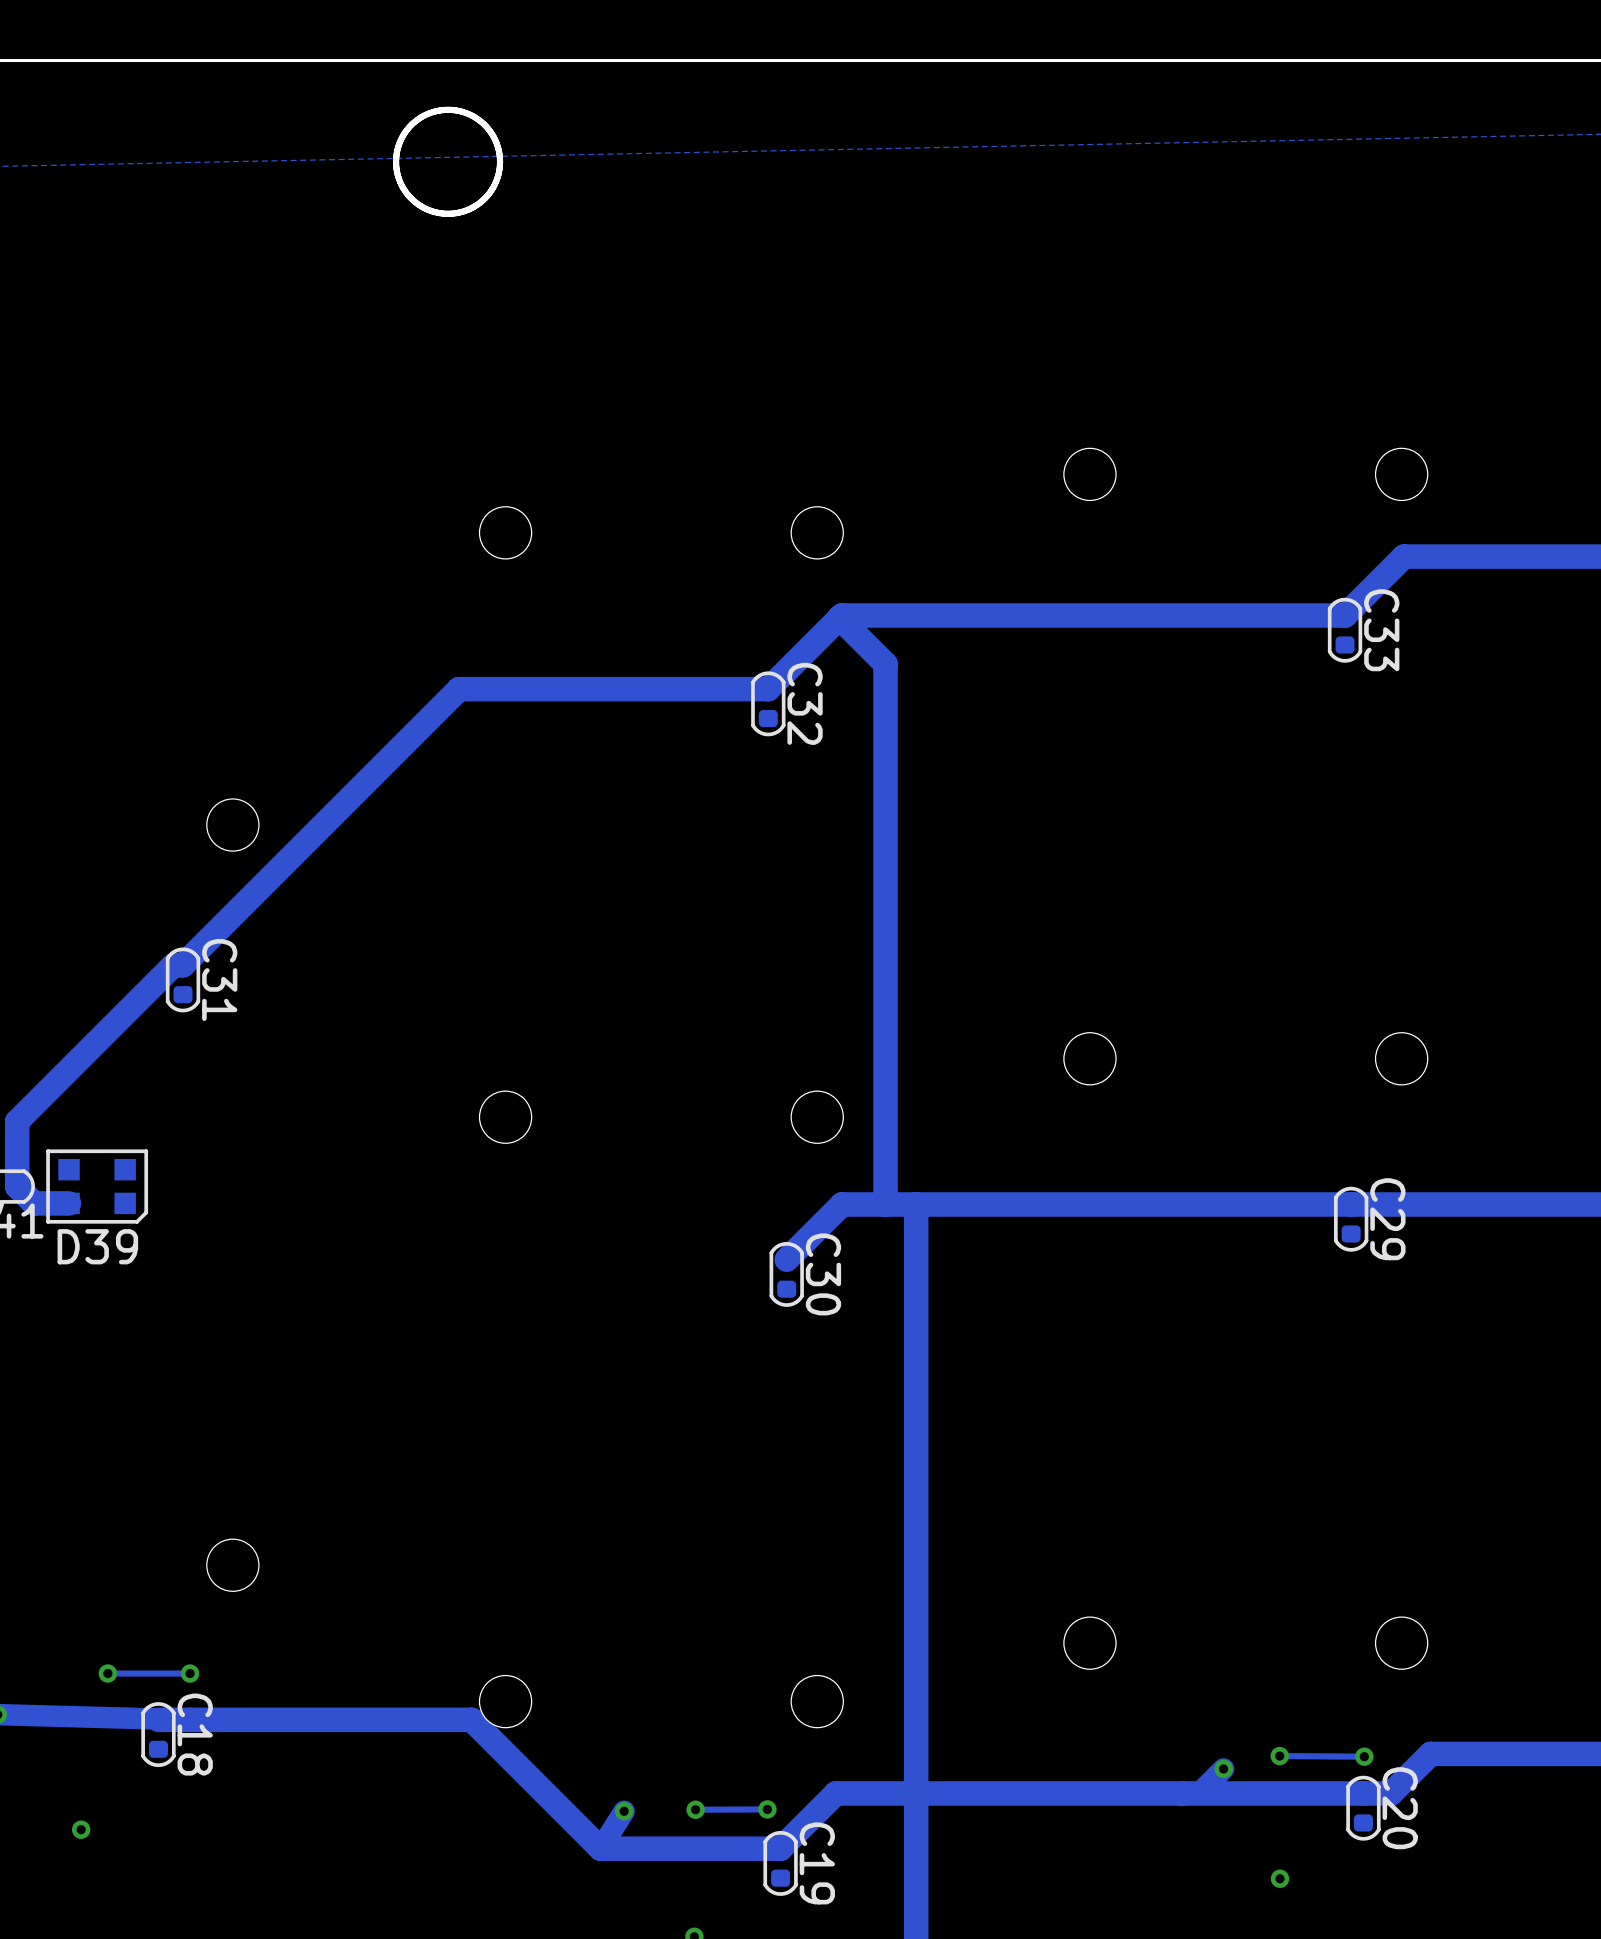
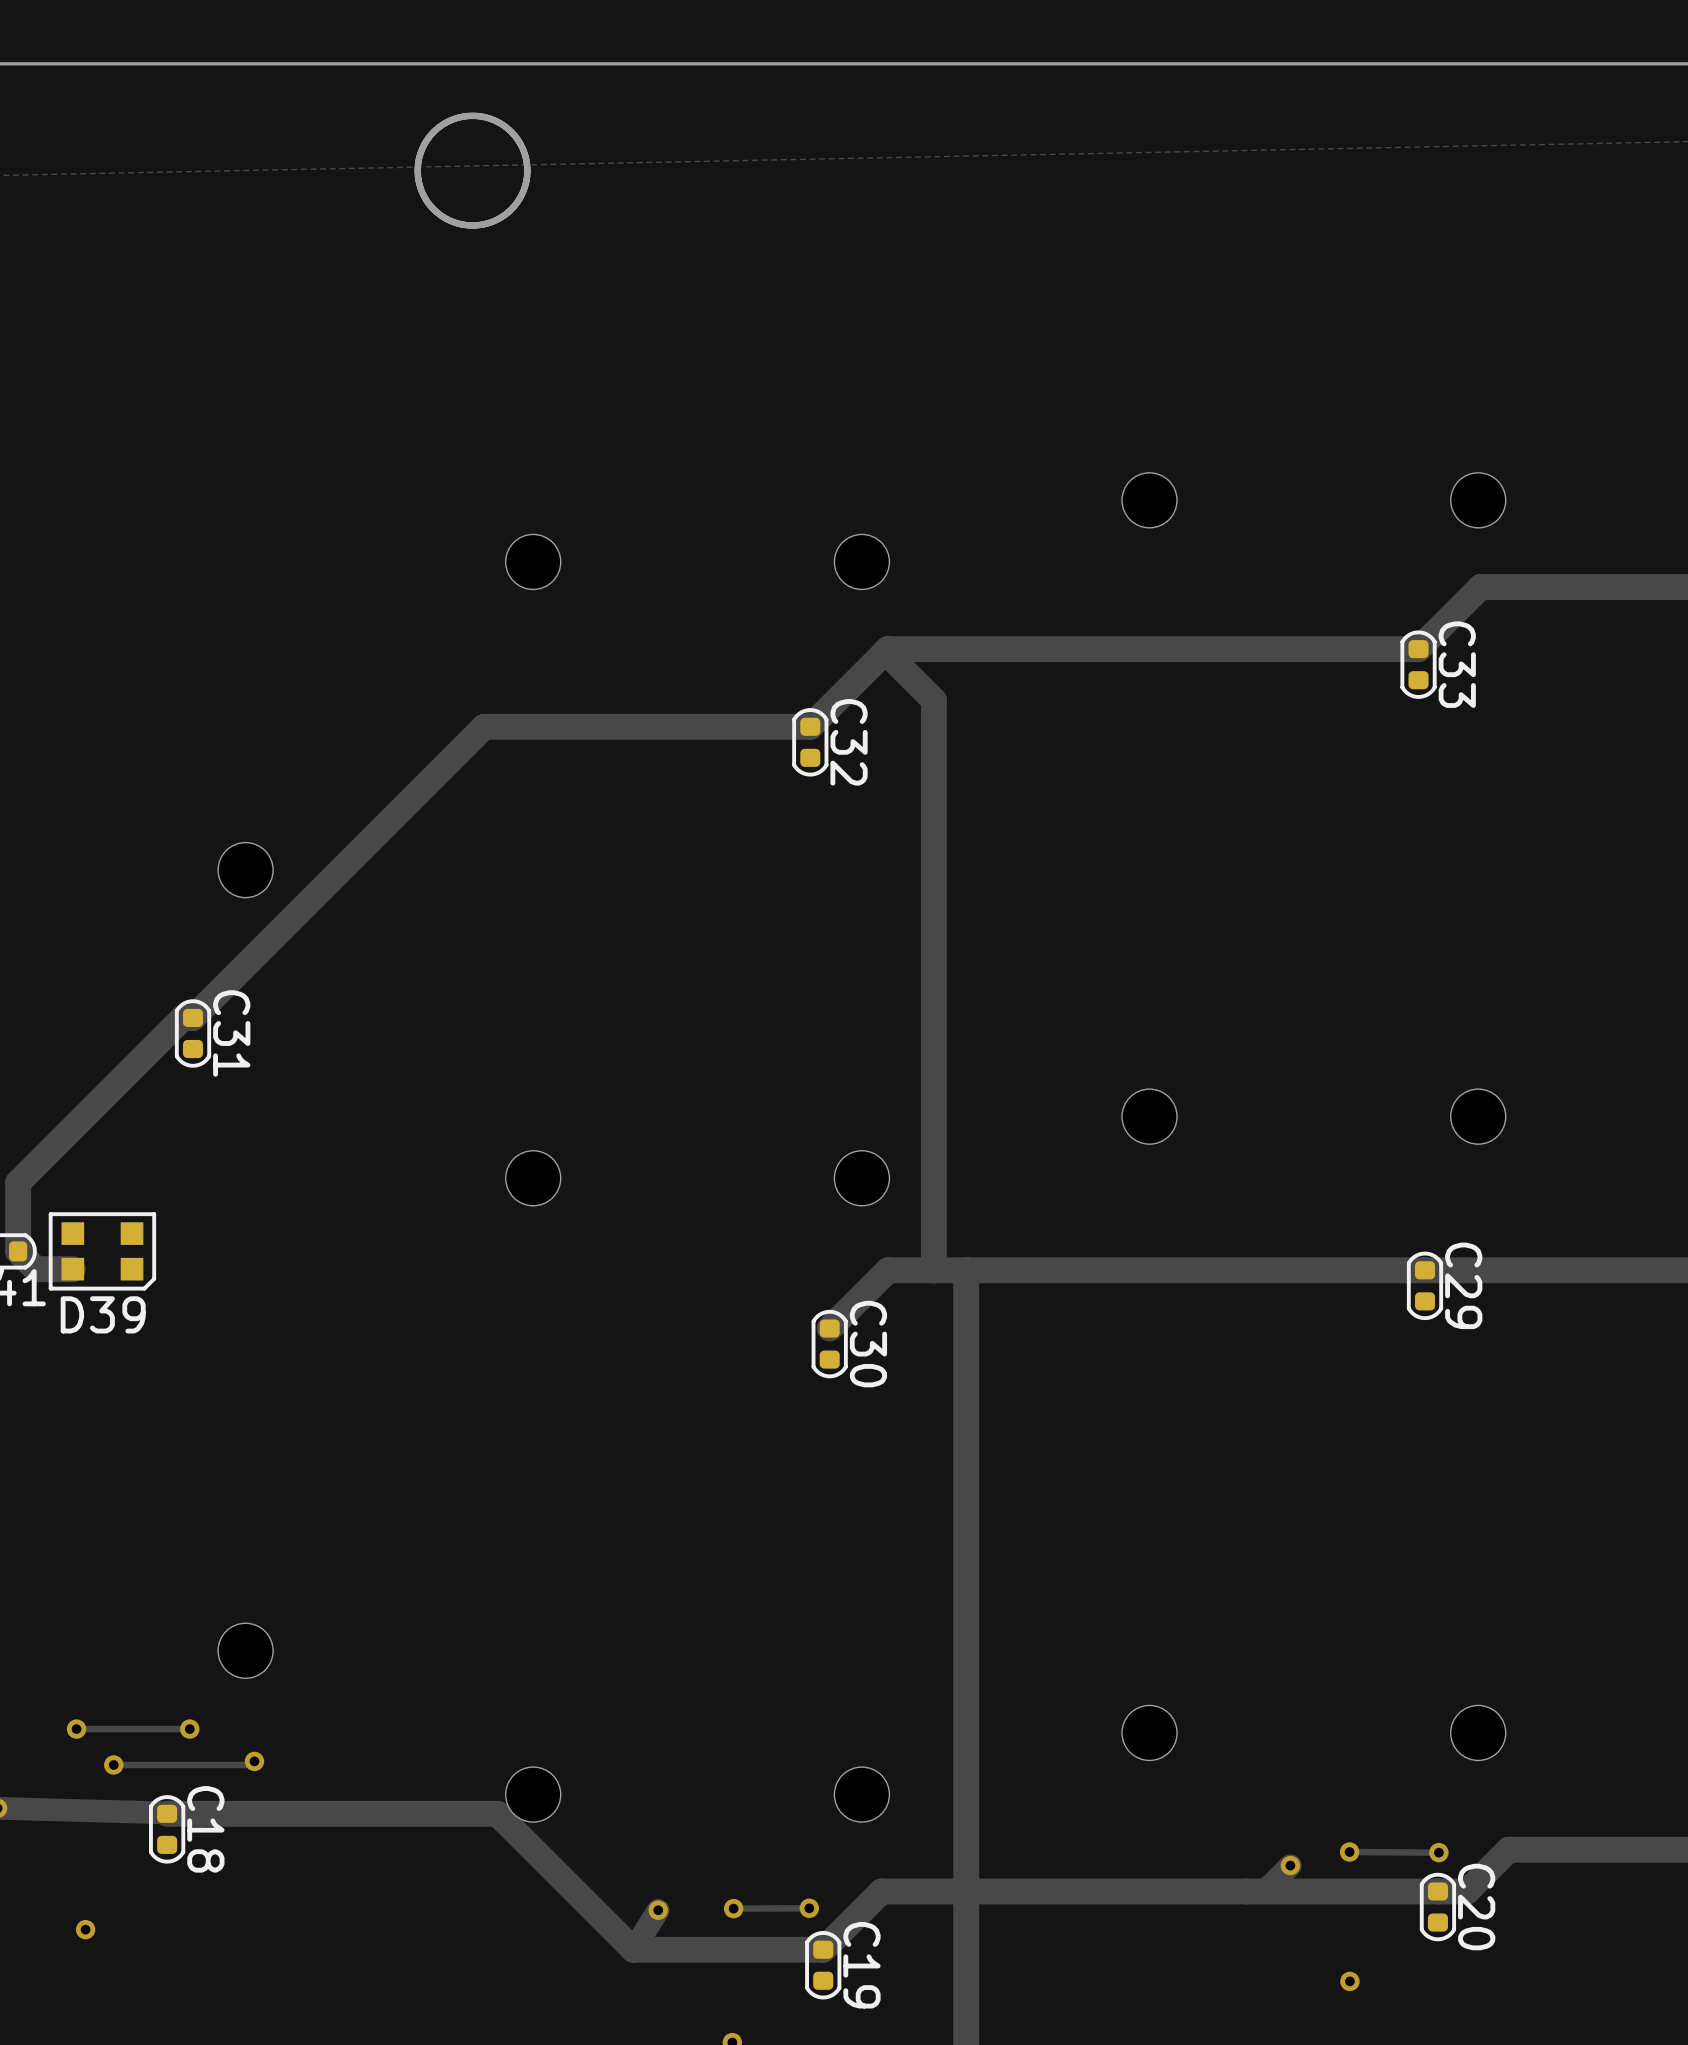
via: none -> (76, 1729)
track: none -> (189, 1729) (76, 1729)
via: none -> (189, 1729)
track: none -> (254, 1761) (250, 1764) (200, 1764)
via: none -> (254, 1761)
via: (190, 1673) -> none

